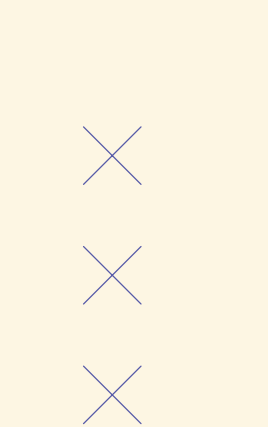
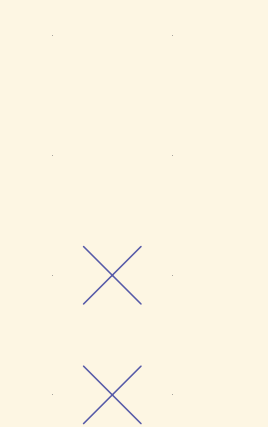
no-connect mark: (112, 155) -> none

